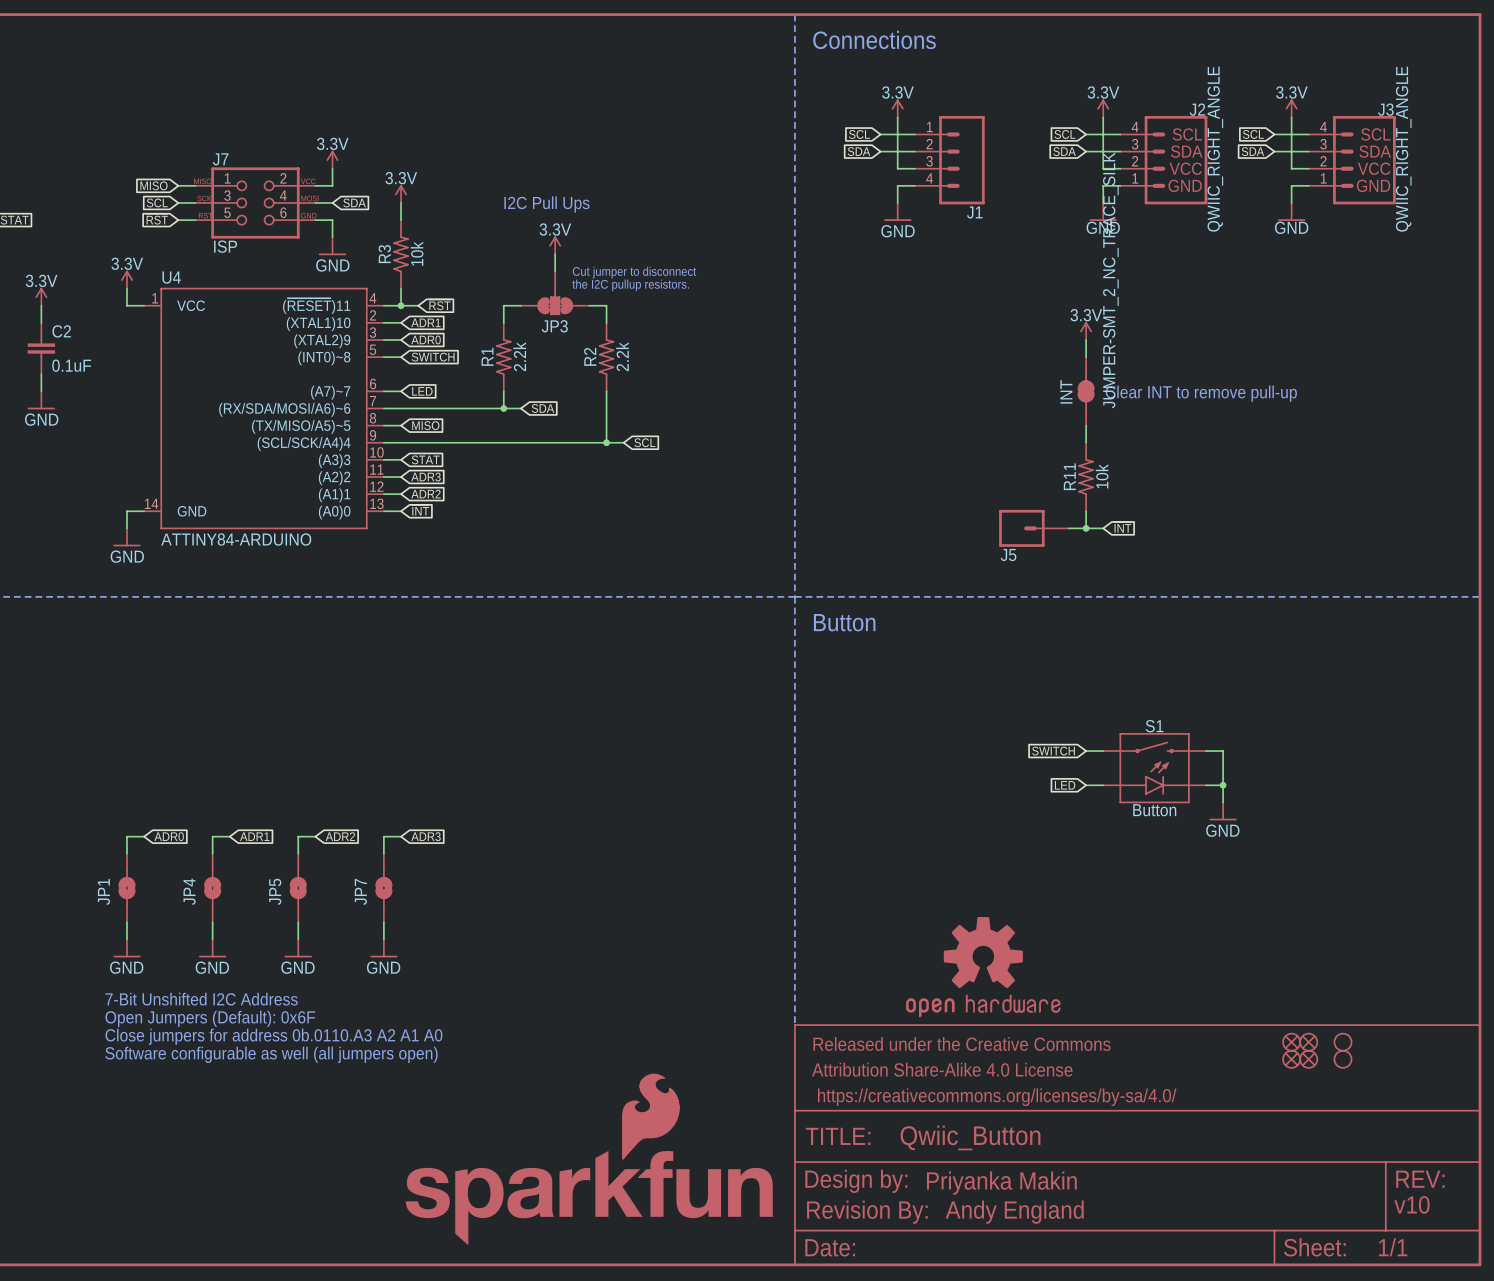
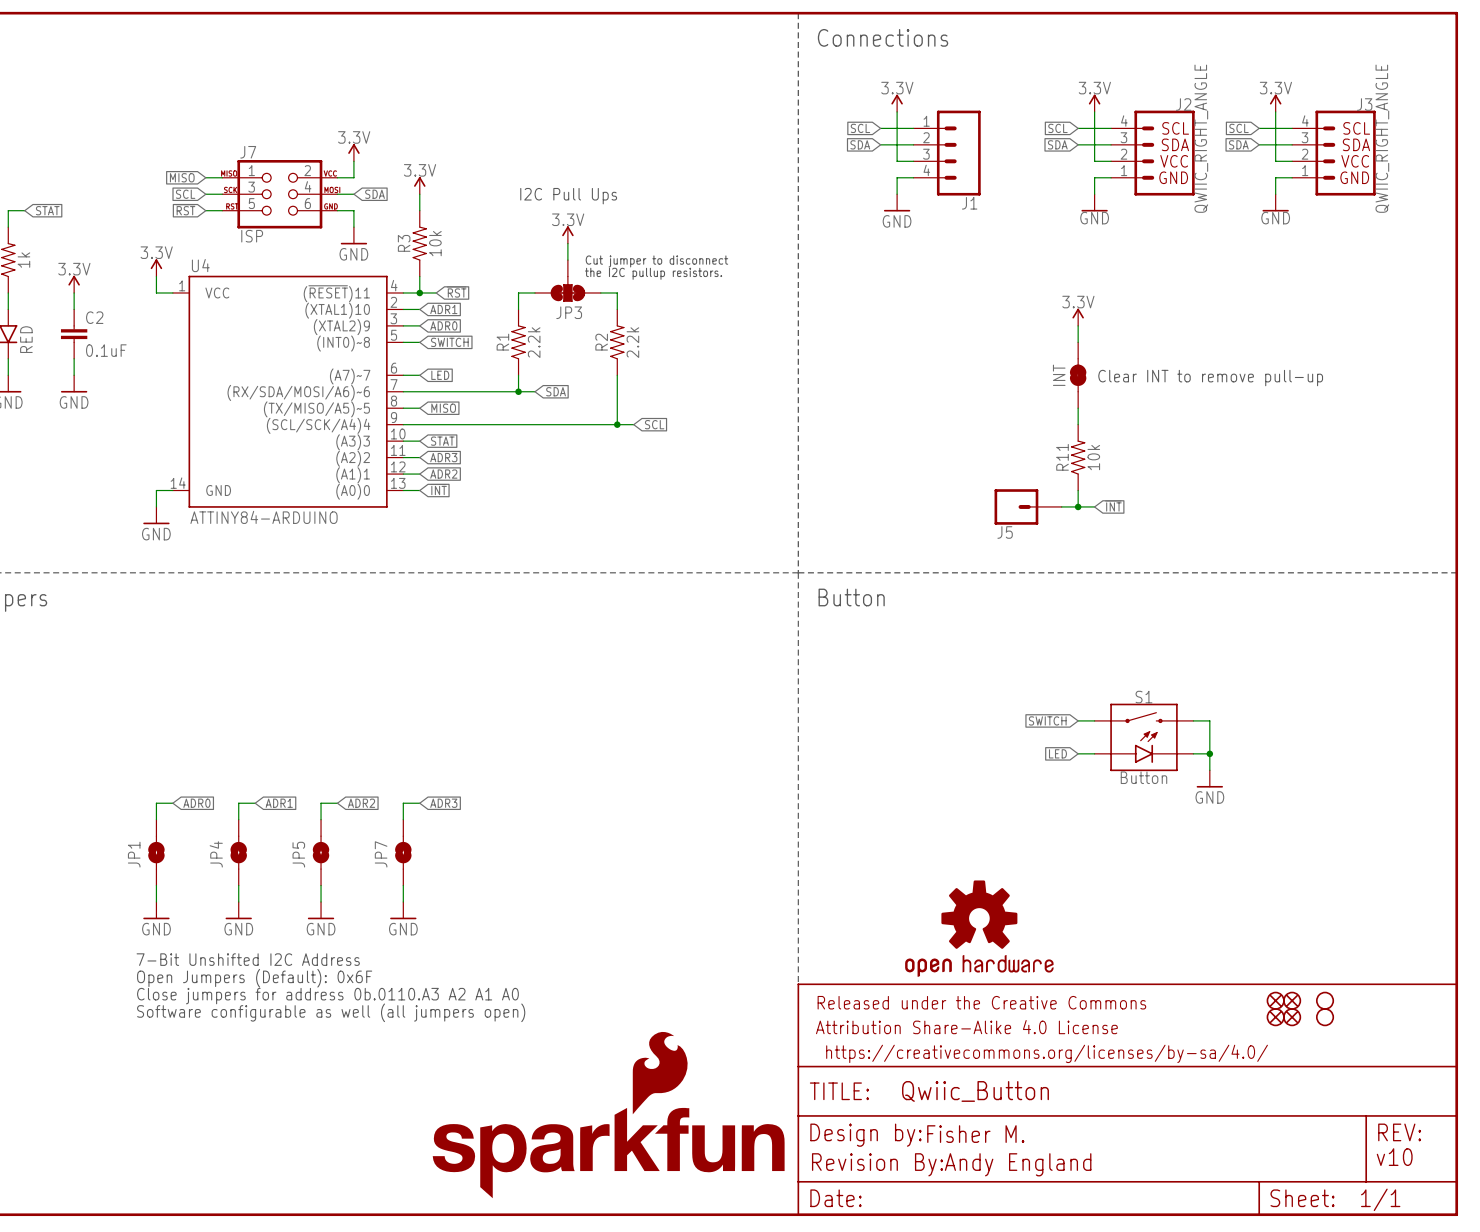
INT value: JUMPER-SMT_2_NC_TRACE_SILK (1110, 280) -> none
part: (589, 1159) -> none
text: Priyanka Makin (1001, 1183) -> Fisher M. (975, 1134)
part: none -> (608, 1153)

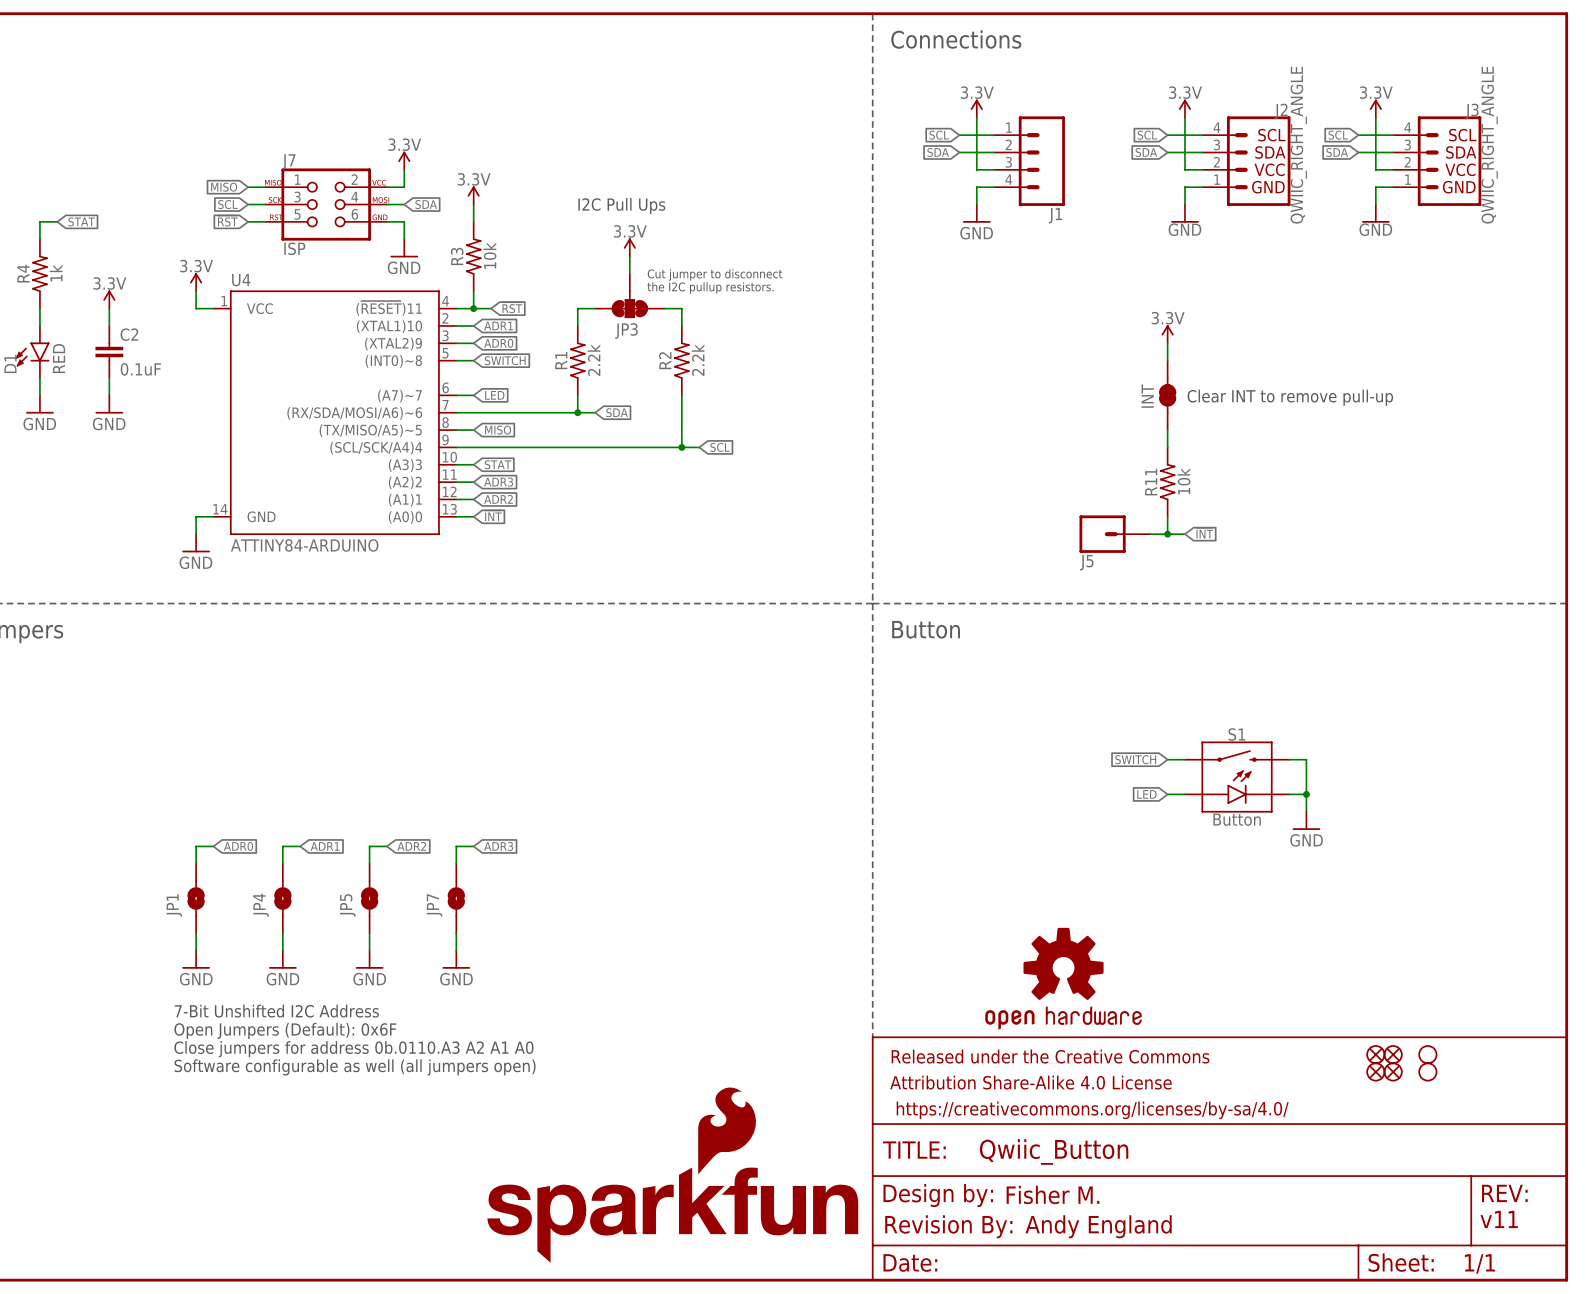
text: v10 (1394, 1157) -> v11 (1499, 1219)

